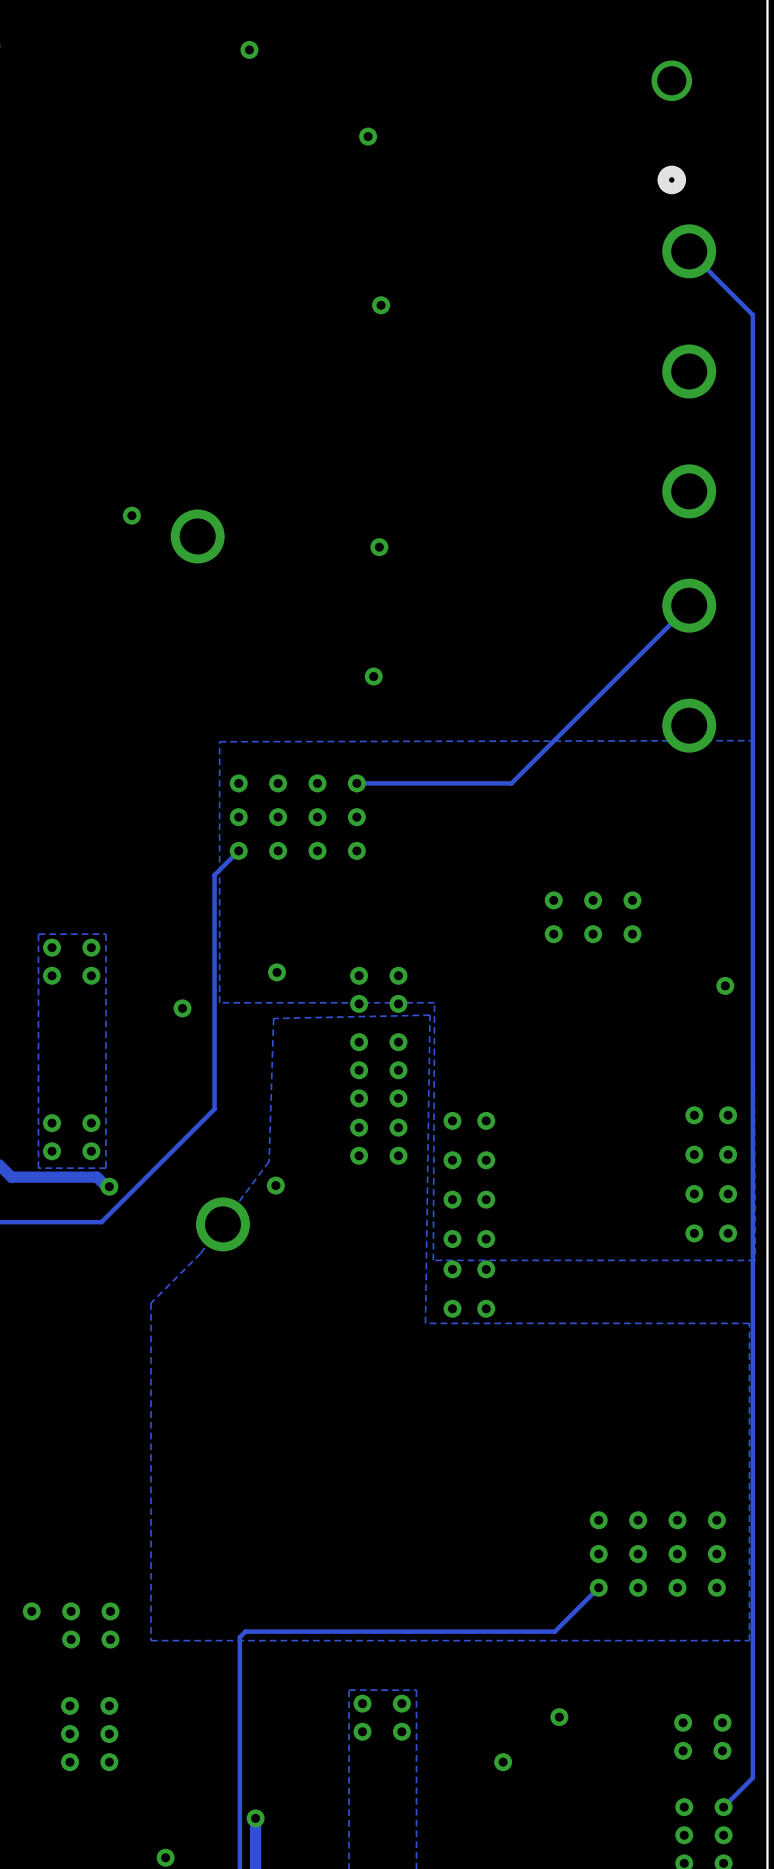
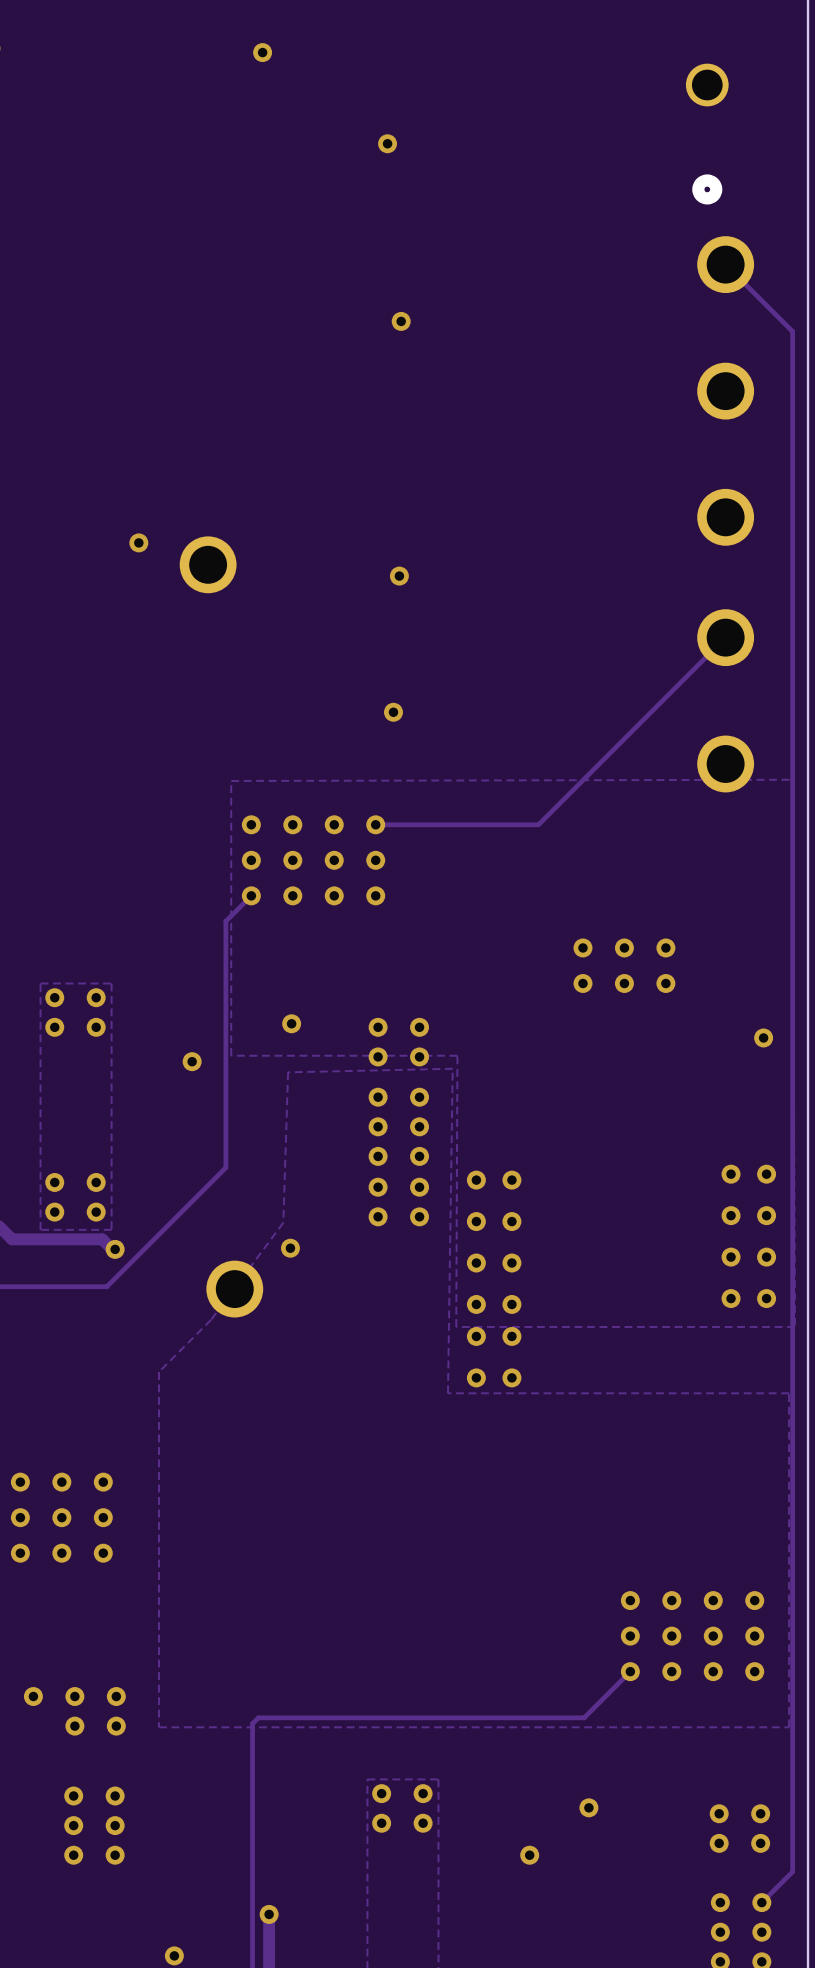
via: none -> (20, 1482)
via: none -> (61, 1482)
via: none -> (103, 1482)
via: none -> (20, 1517)
via: none -> (61, 1517)
via: none -> (103, 1517)
via: none -> (20, 1553)
via: none -> (61, 1553)
via: none -> (103, 1553)

